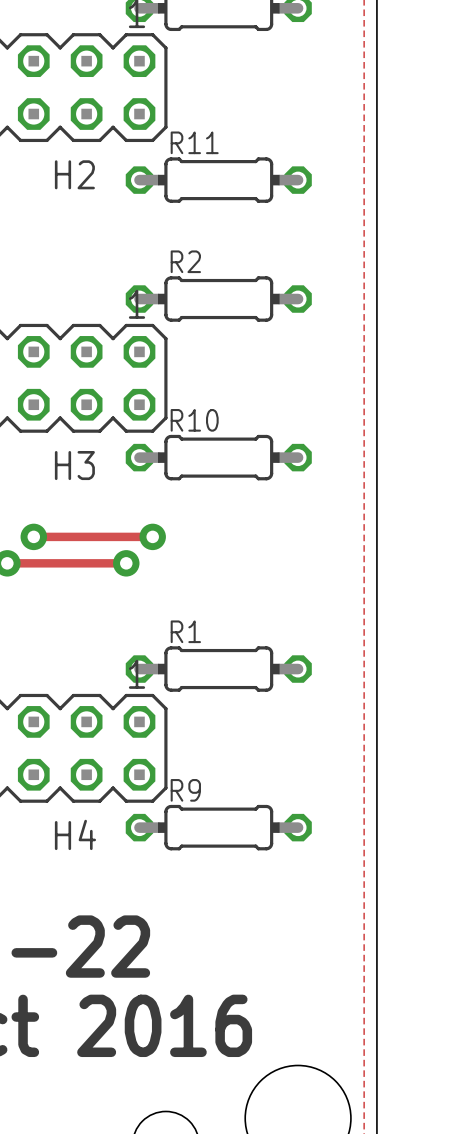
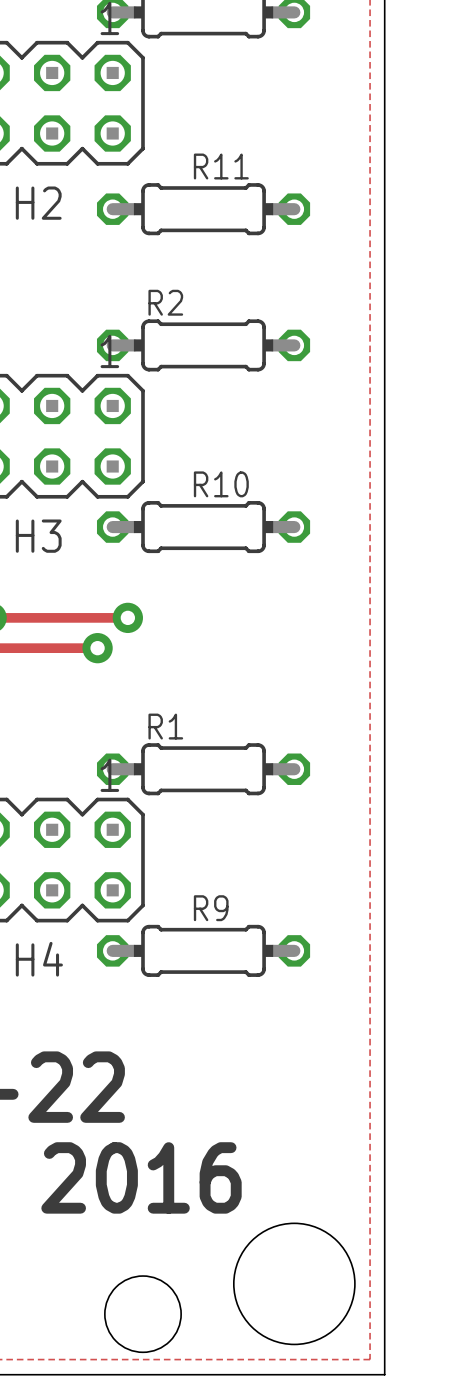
R11 name position: R11 (194, 142) -> R11 (221, 166)
R10 name position: R10 (194, 420) -> R10 (221, 484)
R9 name position: R9 (185, 790) -> R9 (211, 908)

